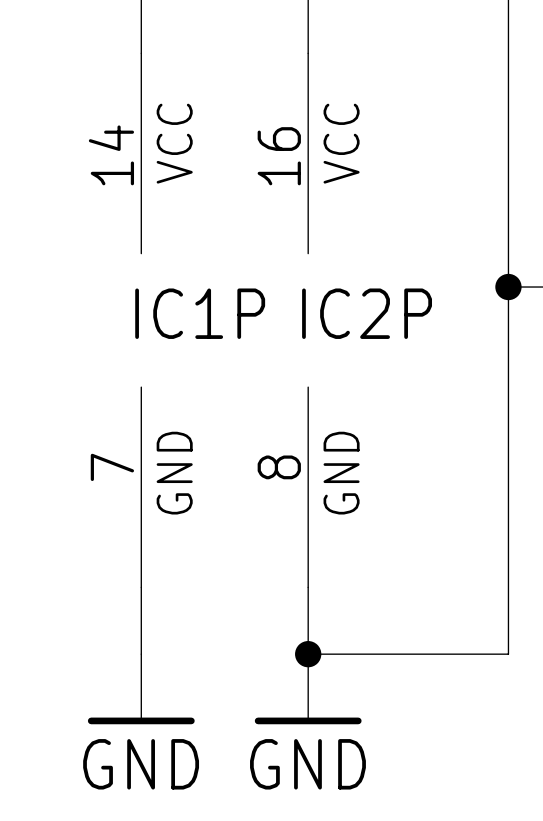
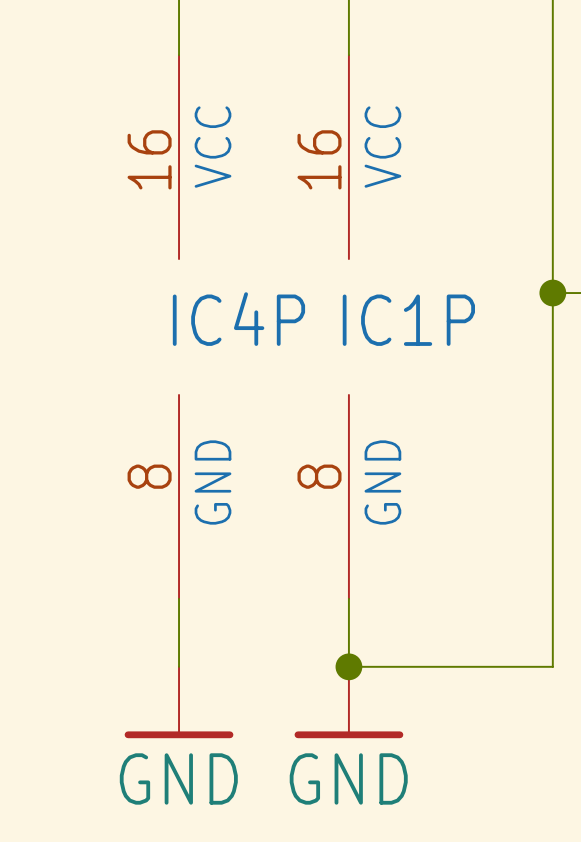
IC1P pin number: 14 (111, 155) -> 16 (149, 159)
IC1P name: IC1P (200, 313) -> IC4P (238, 319)
IC2P name: IC2P (367, 313) -> IC1P (408, 320)
IC1P pin number: 7 (112, 467) -> 8 (149, 476)

